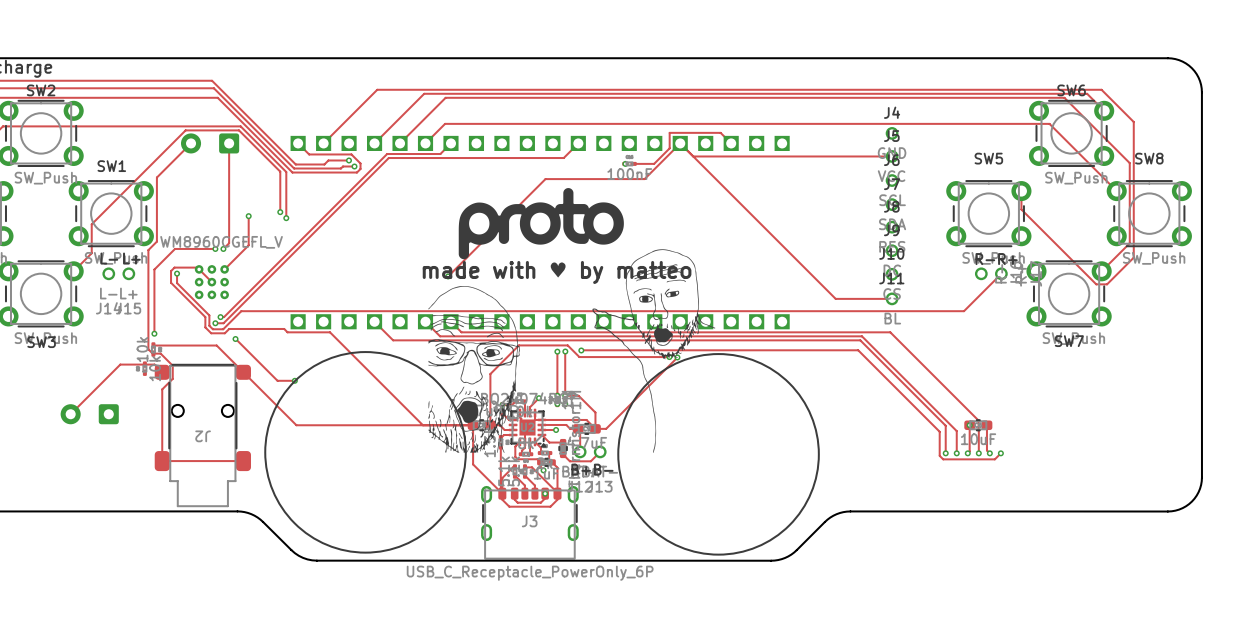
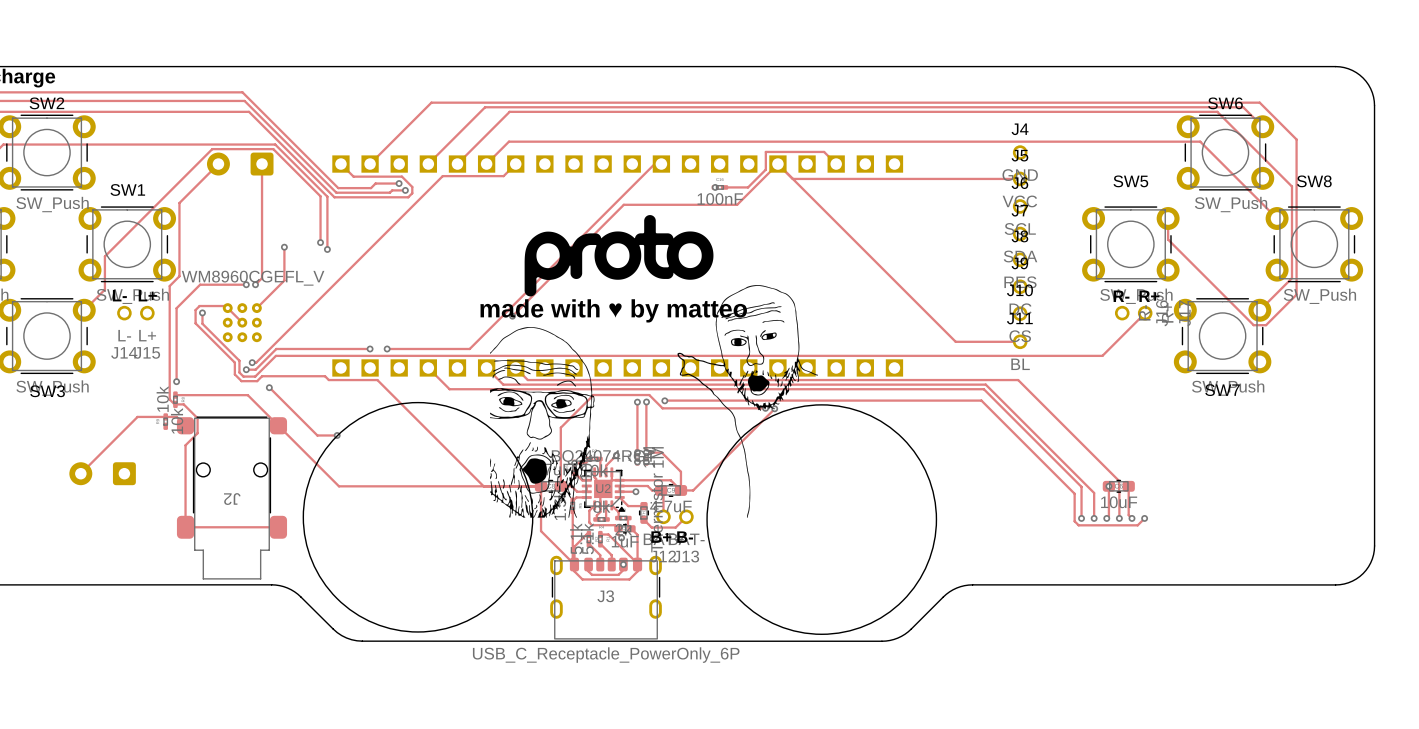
track: (578, 143) (563, 158) (388, 158) (241, 305) -> (661, 164) (654, 164) (469, 348) (387, 348)
track: none -> (276, 348) (370, 348)
via: none -> (370, 348)
via: none -> (387, 348)

